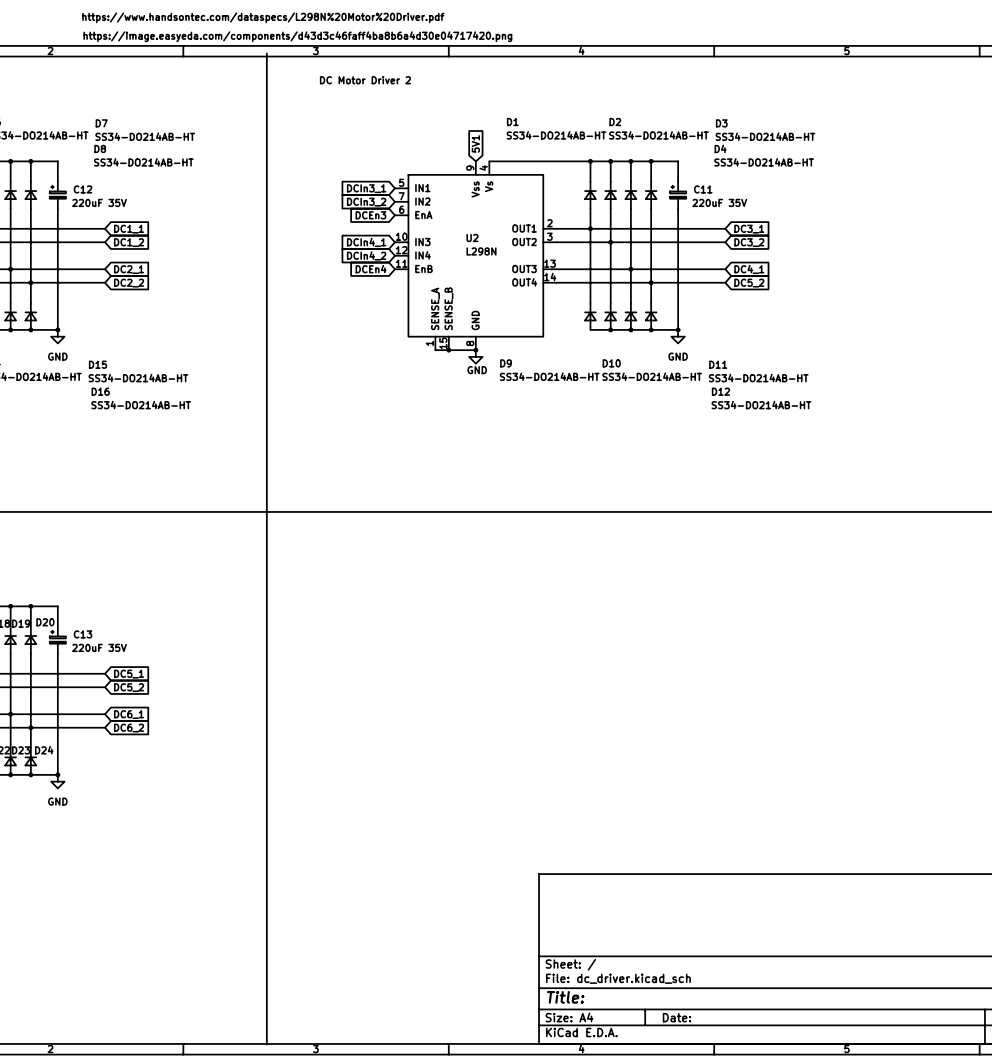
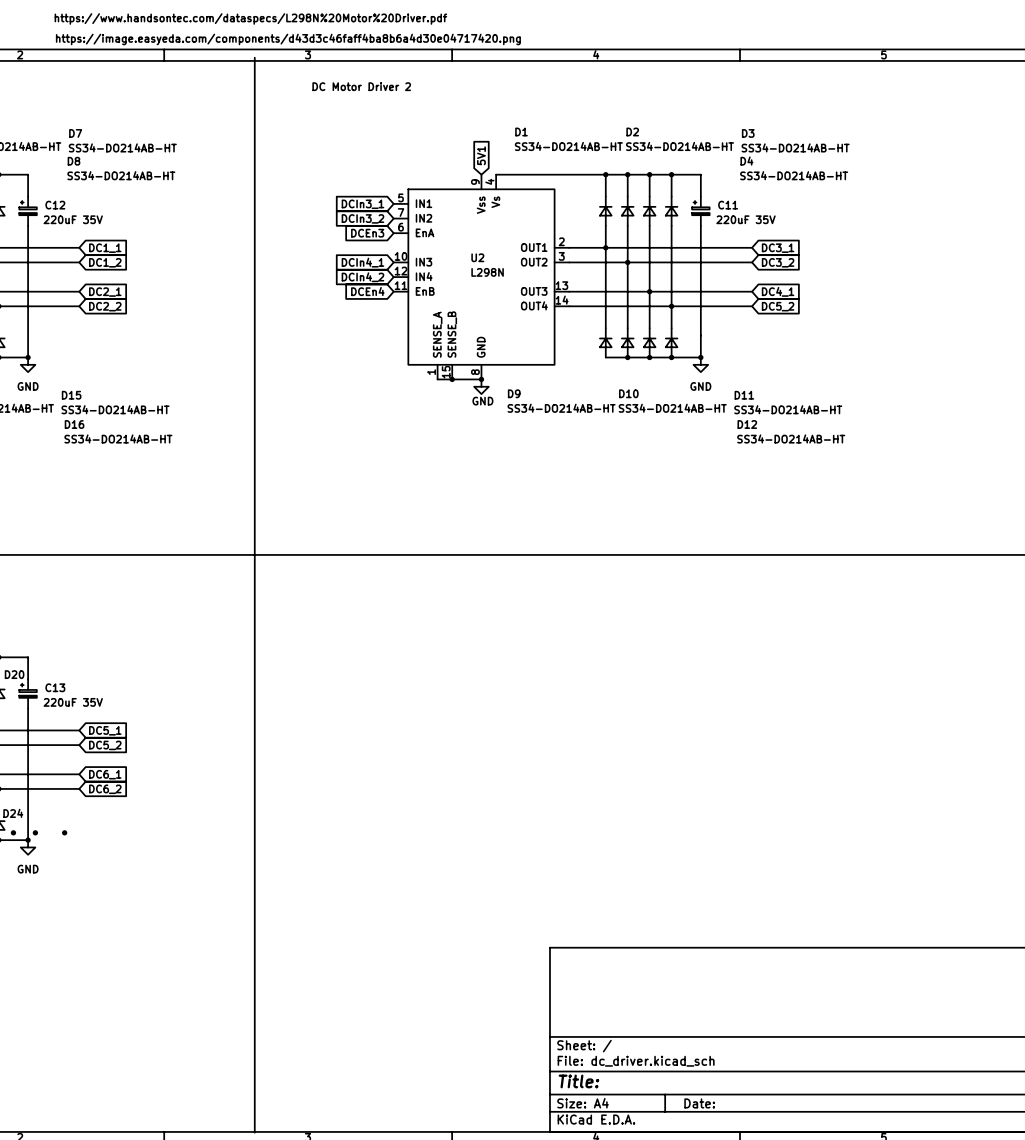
junction: none -> (13, 832)
junction: none -> (35, 832)
junction: none -> (64, 832)

